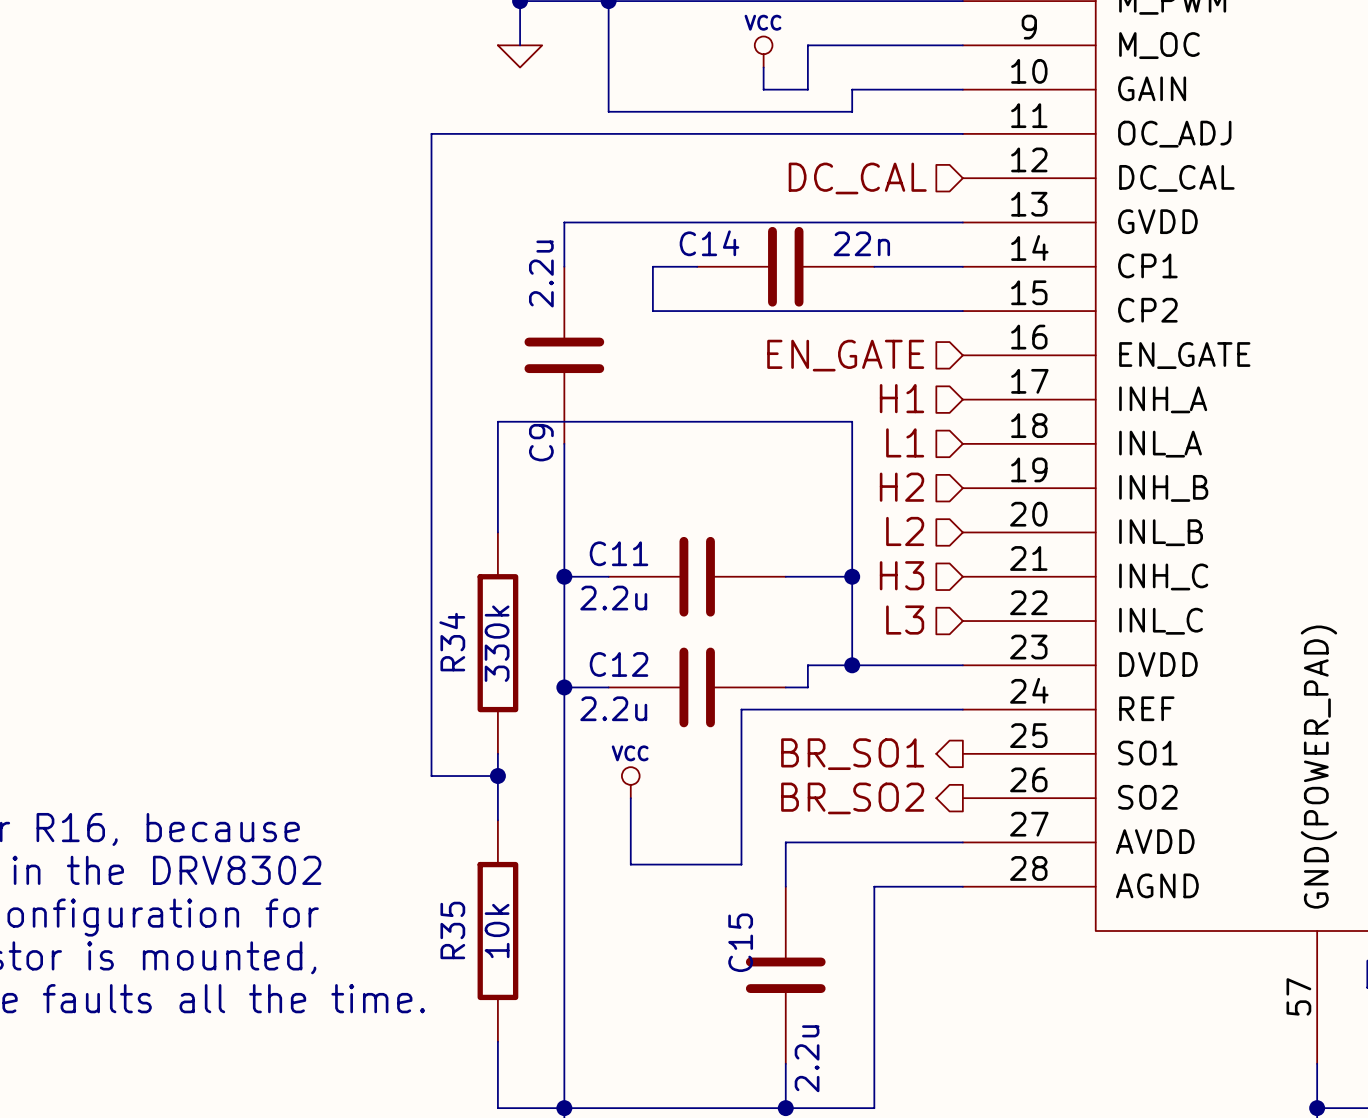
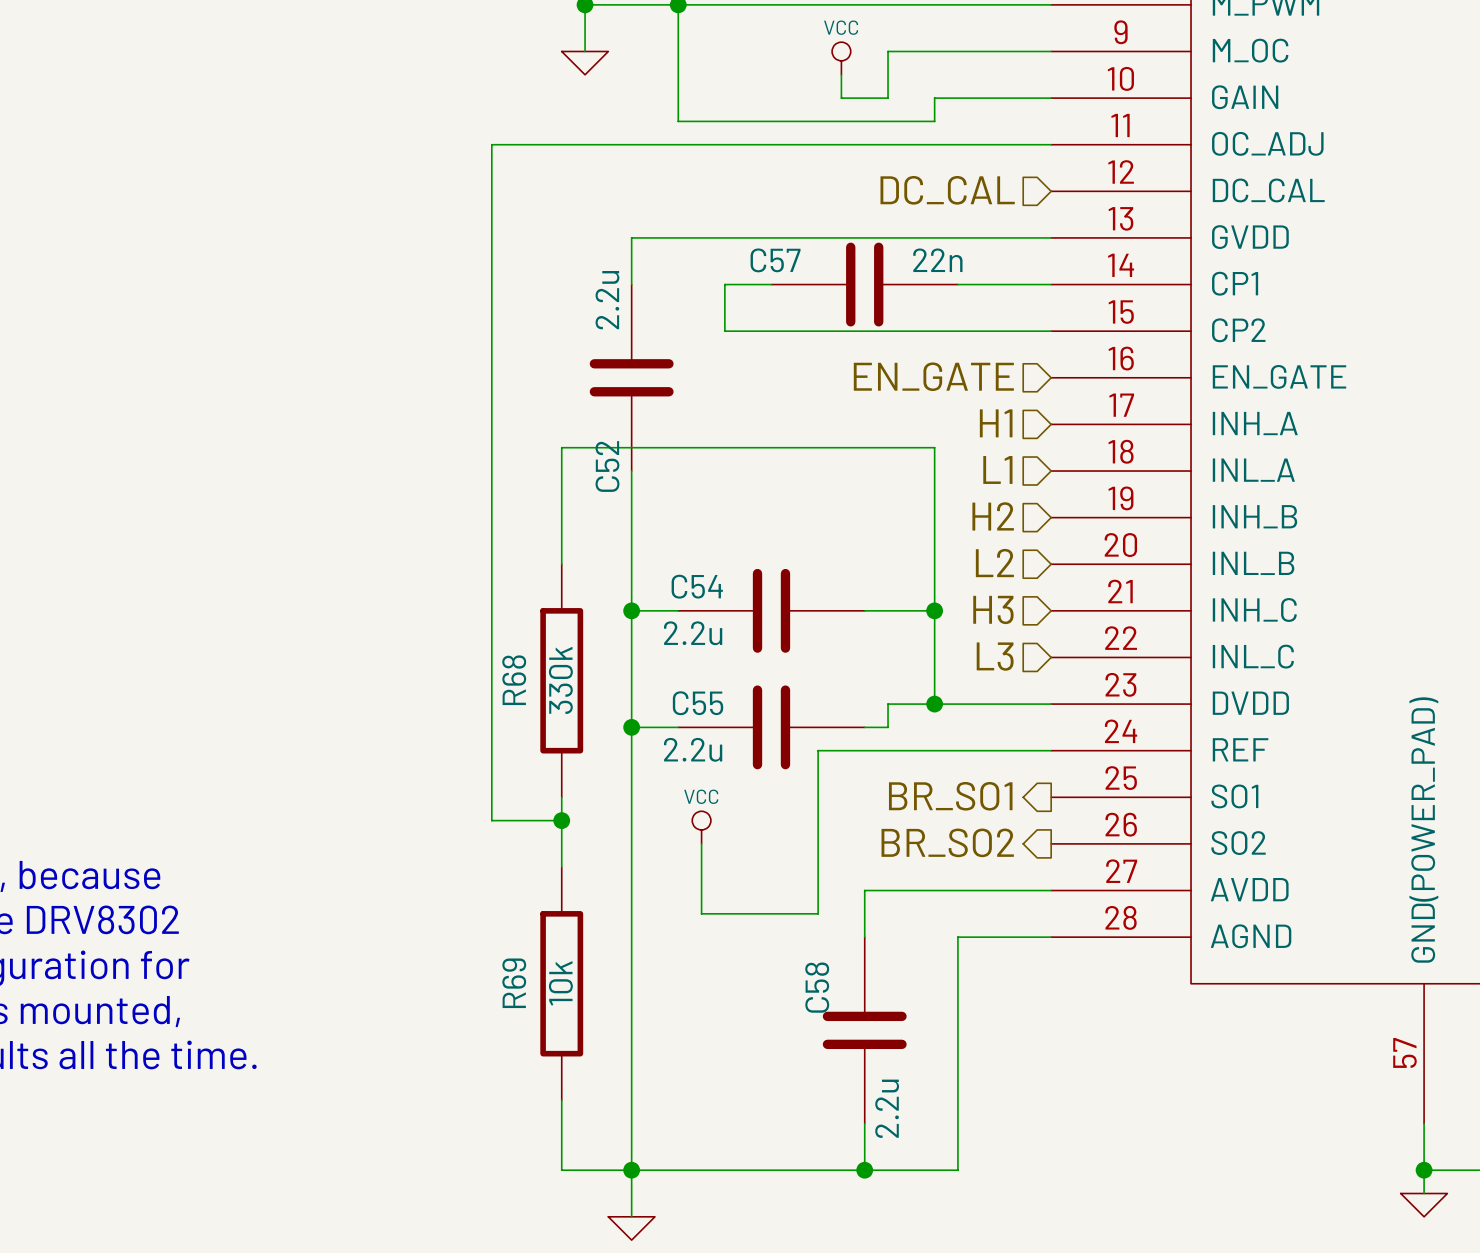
C14 name: C14 (709, 243) -> C57 (775, 260)
C9 name: C9 (541, 442) -> C52 (607, 466)
C11 name: C11 (619, 553) -> C54 (697, 586)
R34 name: R34 (452, 642) -> R68 (514, 680)
C12 name: C12 (619, 664) -> C55 (698, 703)
R35 name: R35 (452, 930) -> R69 (514, 983)
C15 name: C15 (740, 942) -> C58 (817, 987)

